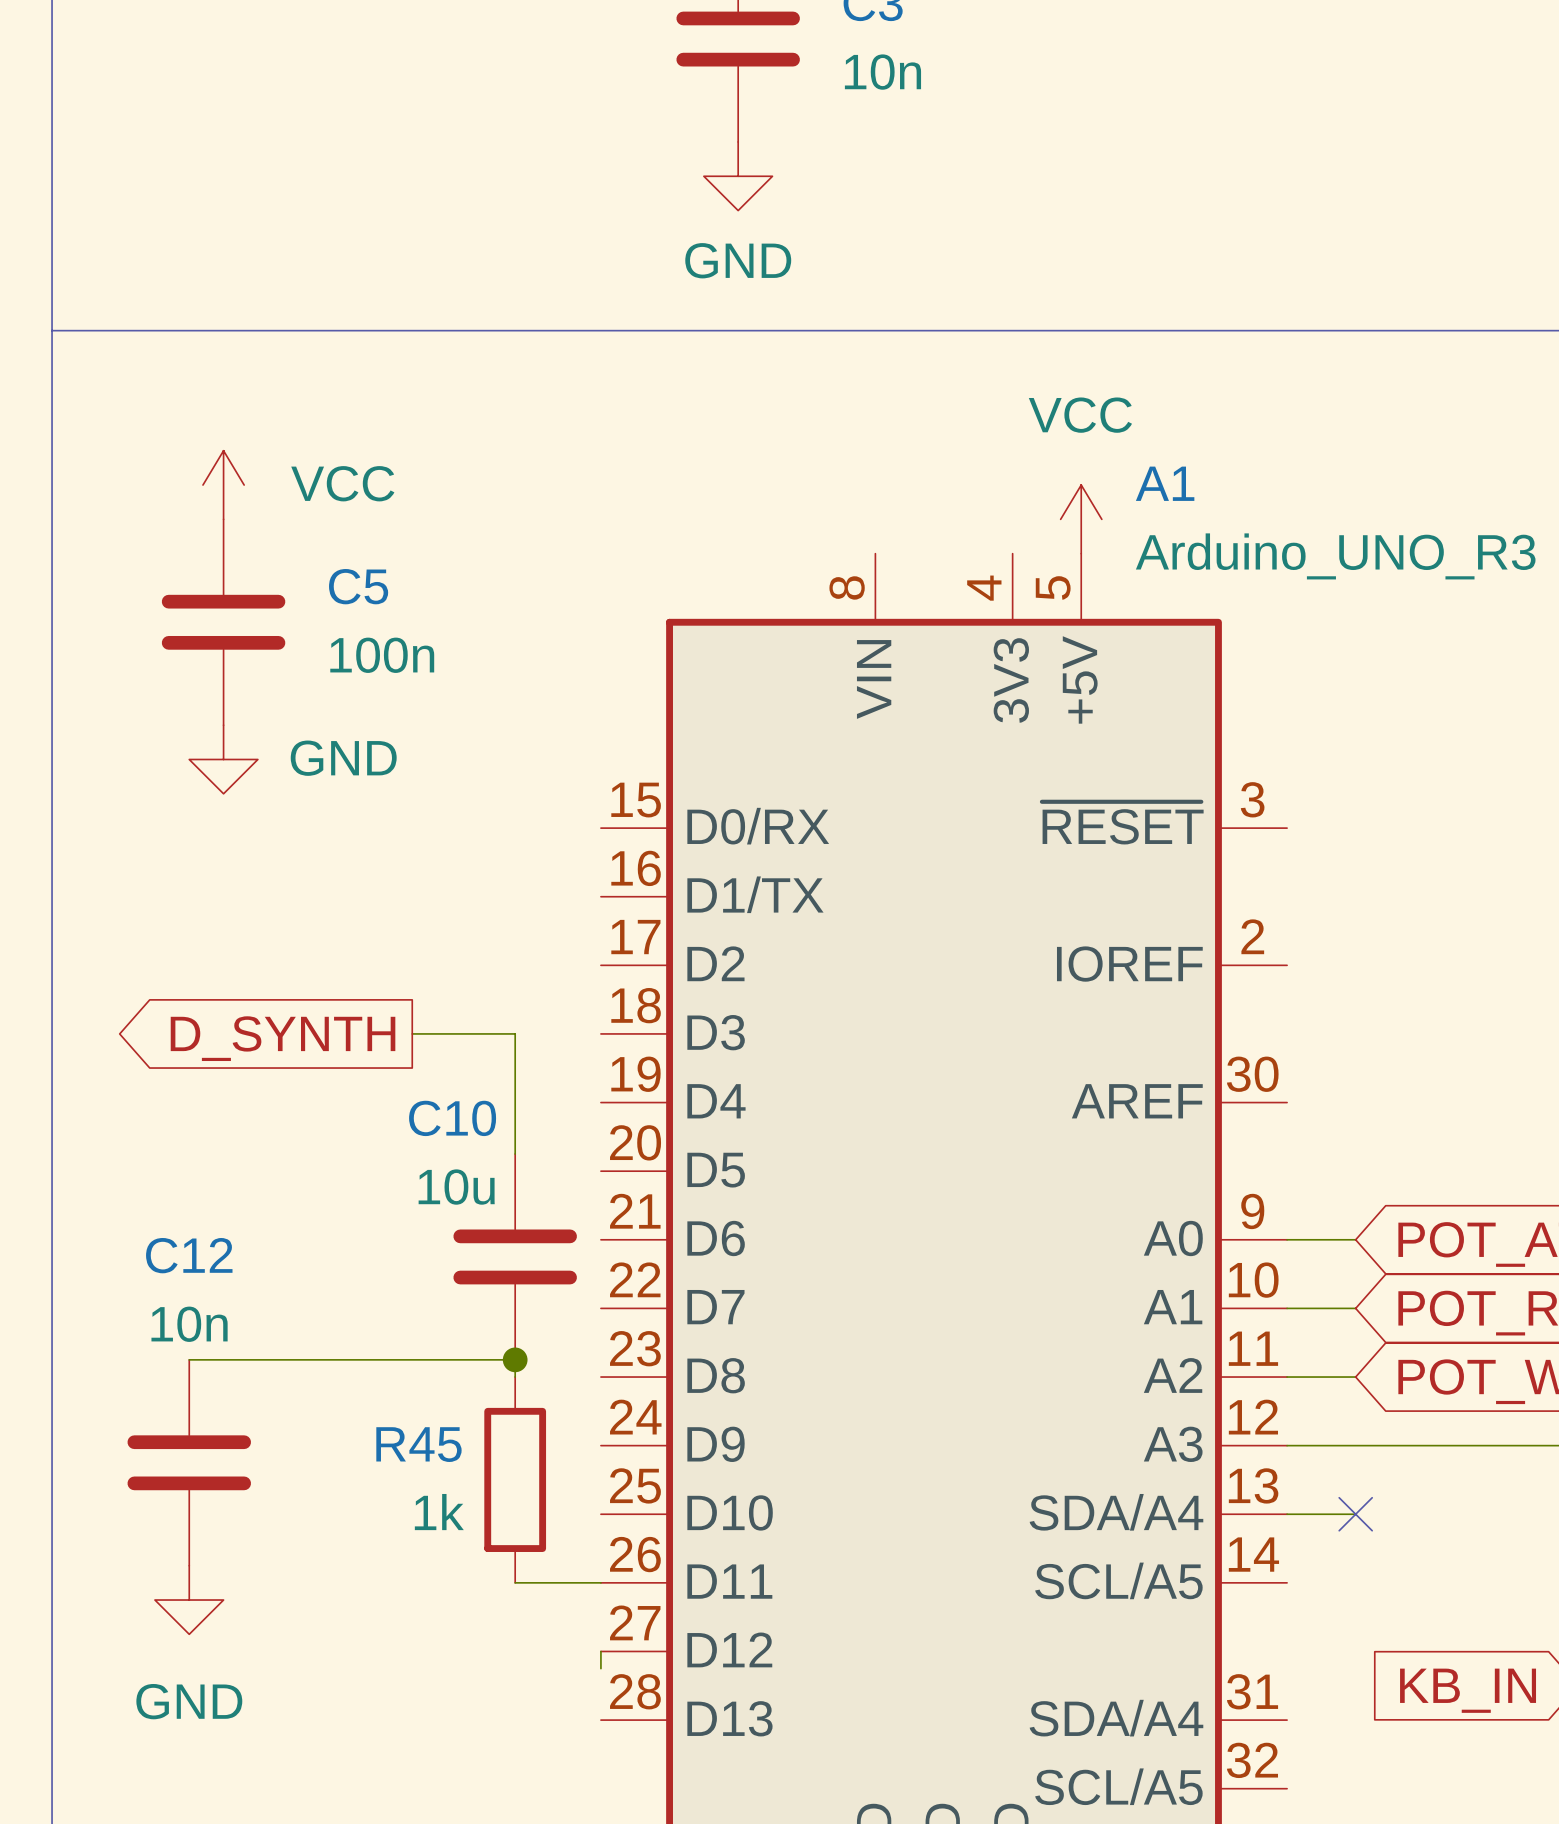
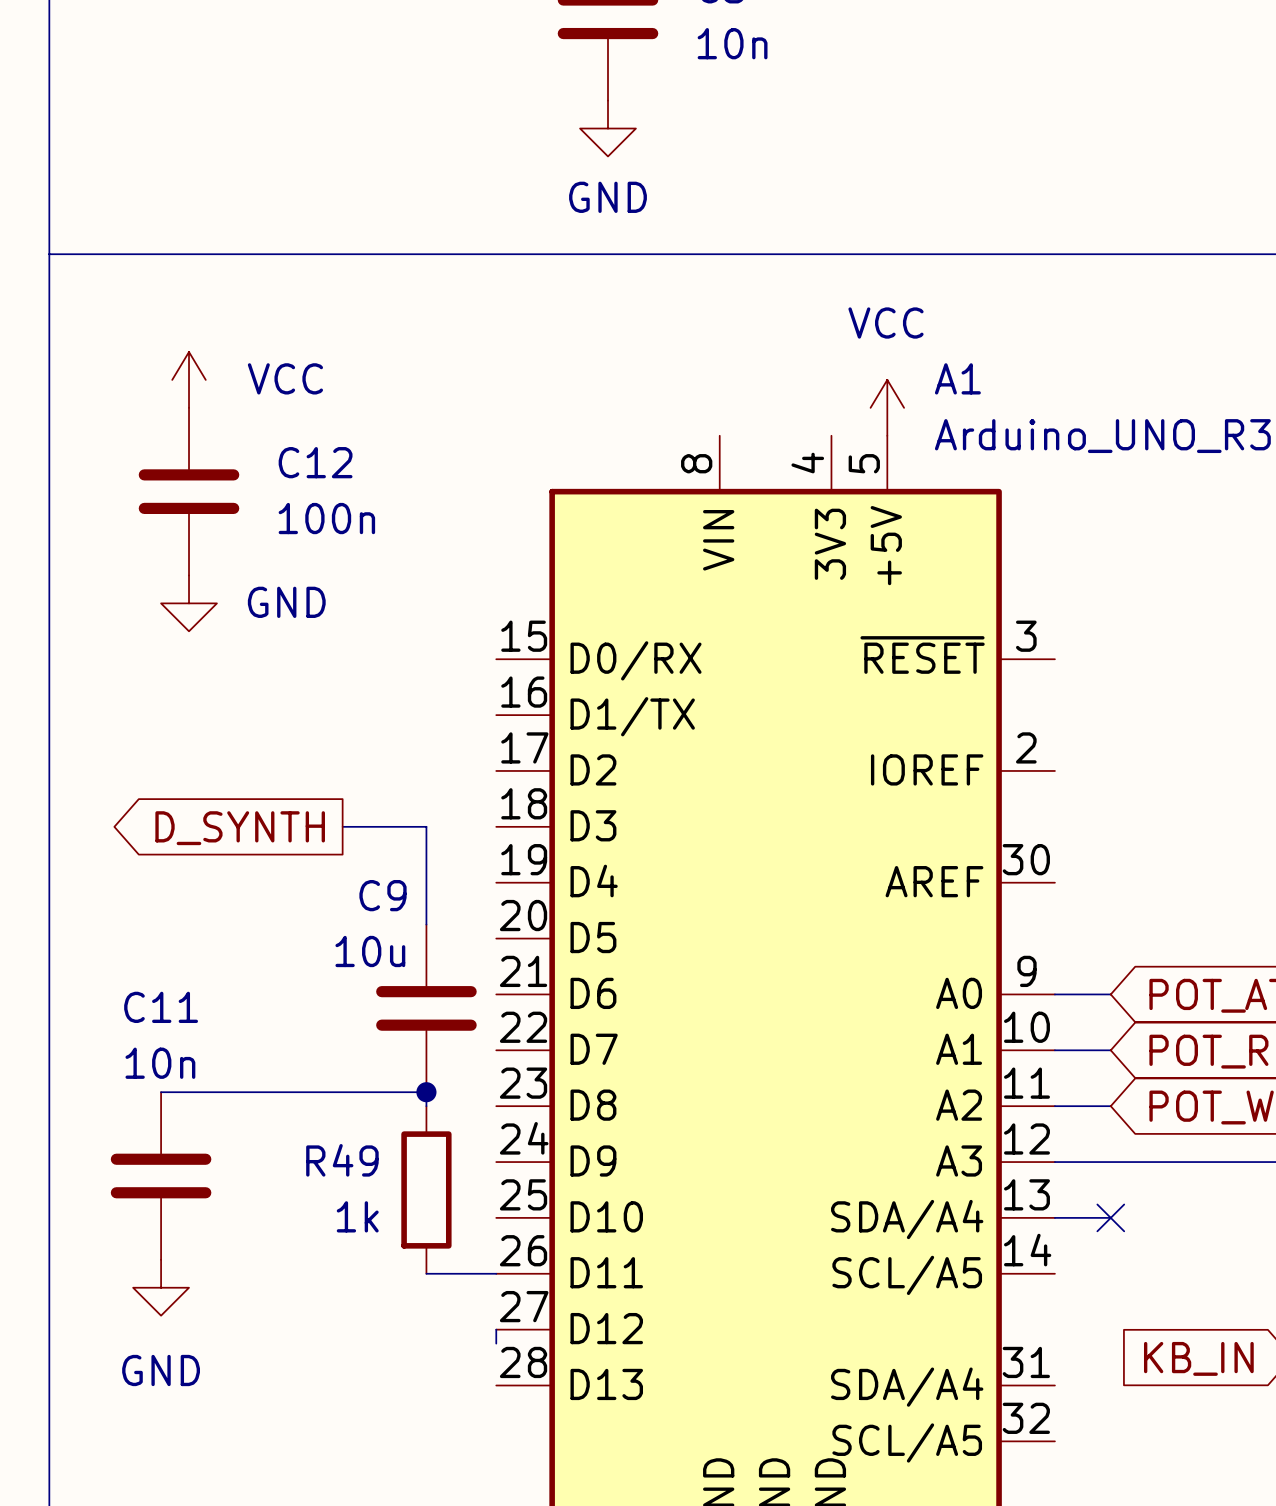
C5 name: C5 (358, 586) -> C12 (315, 462)
C10 name: C10 (452, 1118) -> C9 (382, 895)
C12 name: C12 (189, 1255) -> C11 (161, 1007)
R45 name: R45 (418, 1444) -> R49 (342, 1160)

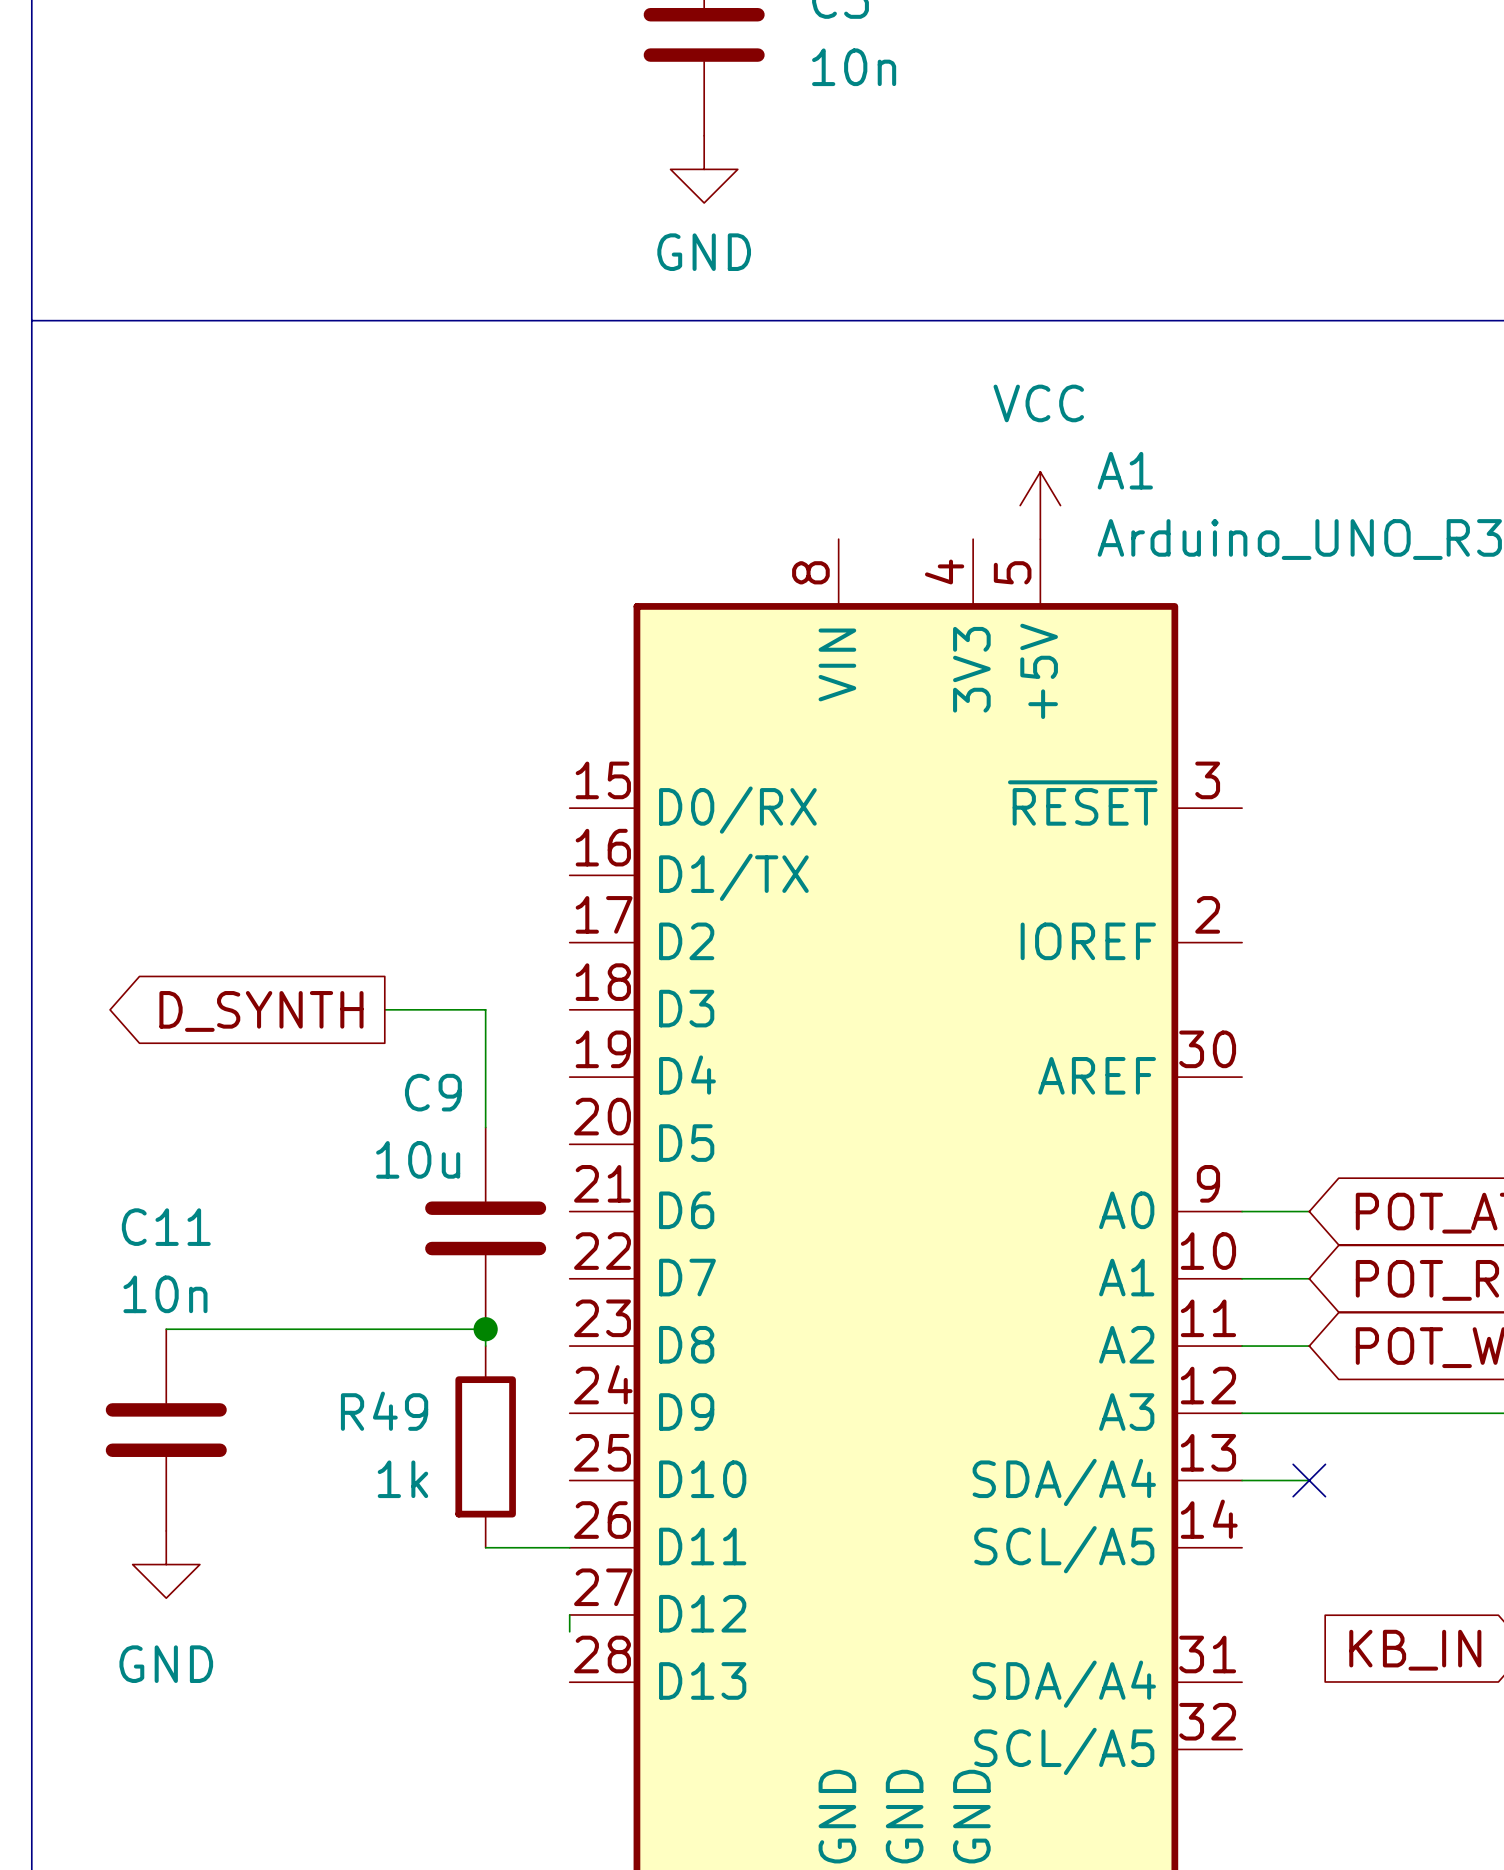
power symbol: VCC (189, 379) -> none
C12: 100n (189, 491) -> none
power symbol: GND (189, 603) -> none

